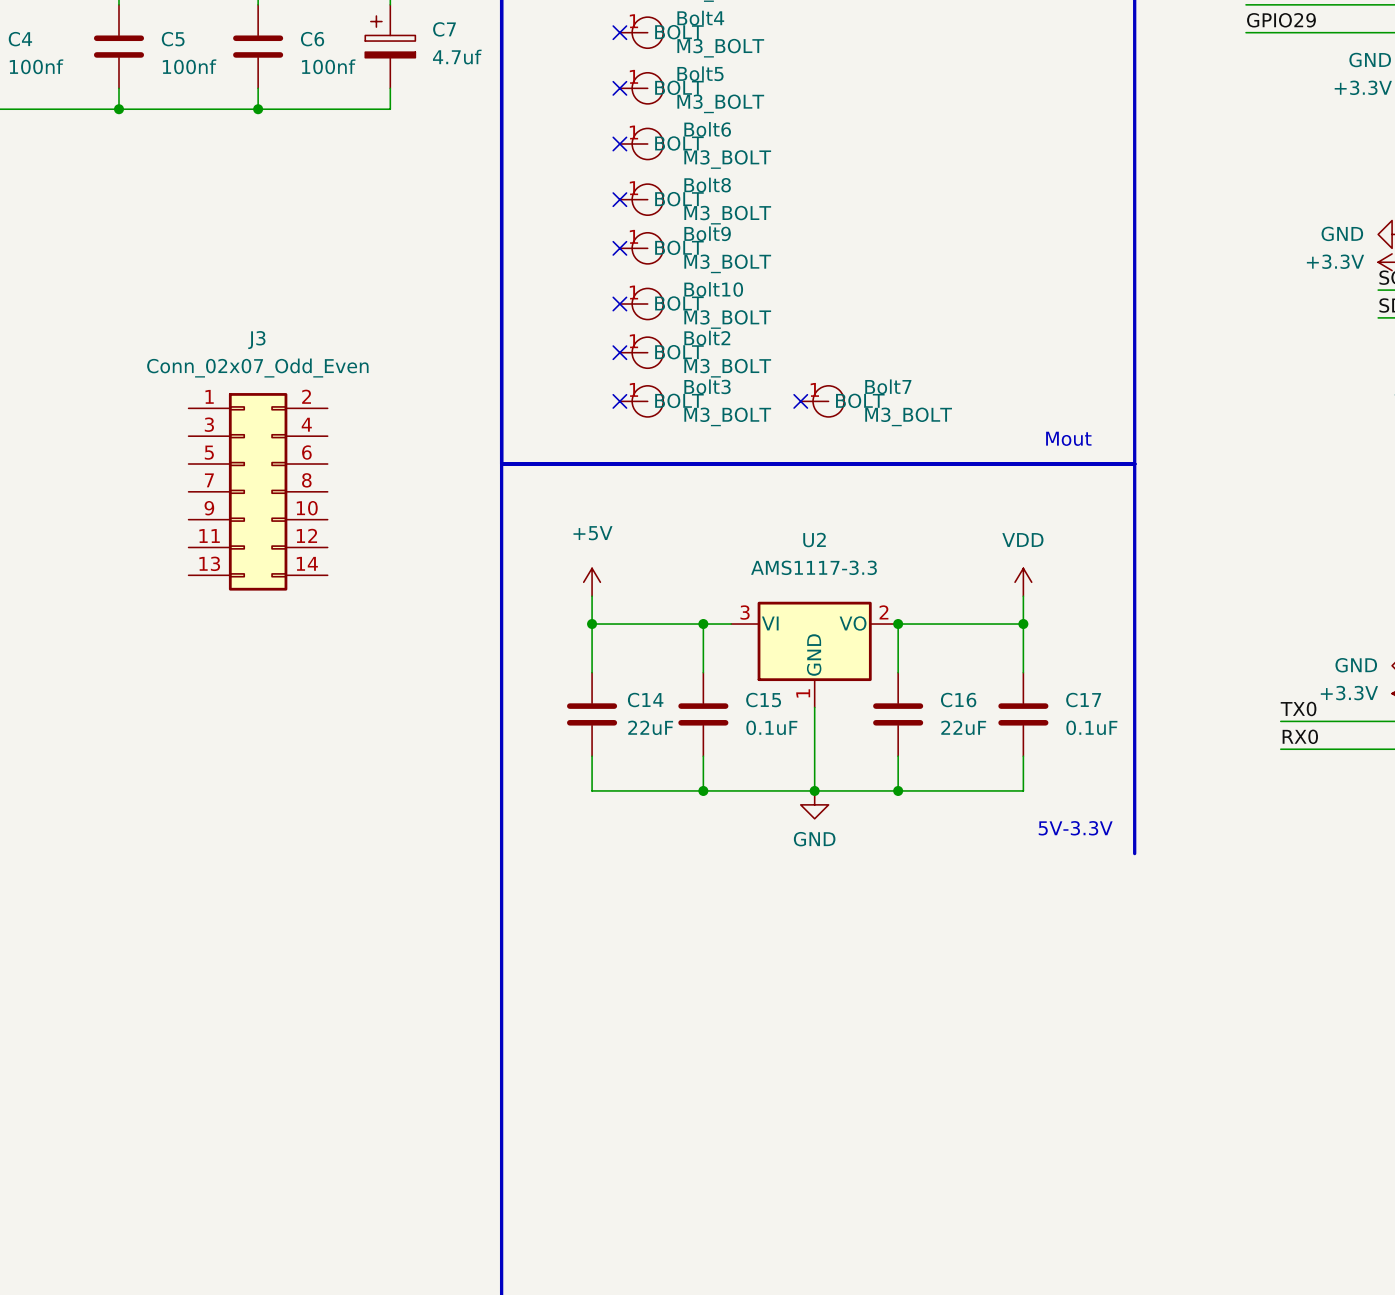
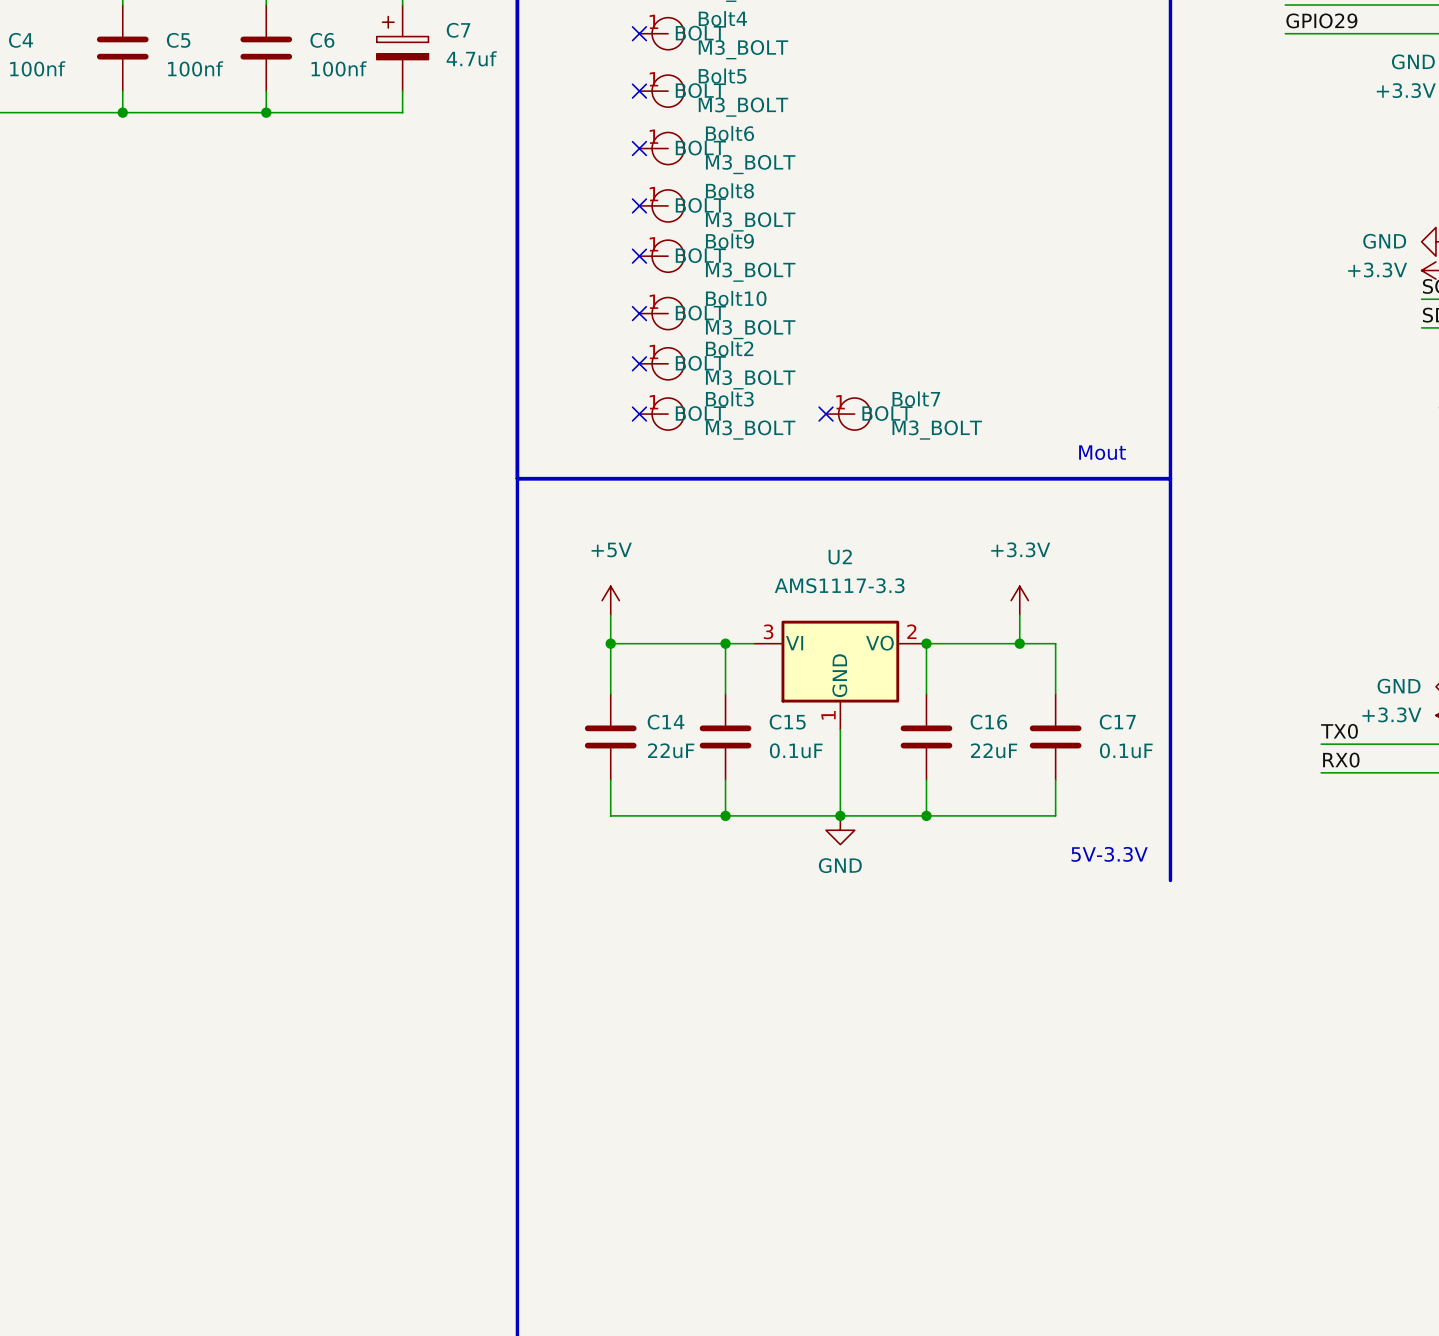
J3: Conn_02x07_Odd_Even (258, 491) -> none
power symbol: none -> +3.3V (1019, 600)
power symbol: VDD (1023, 582) -> none
wire: (1023, 596) (1023, 624) -> (1019, 614) (1019, 643)
junction position: (1023, 624) -> (1019, 643)

